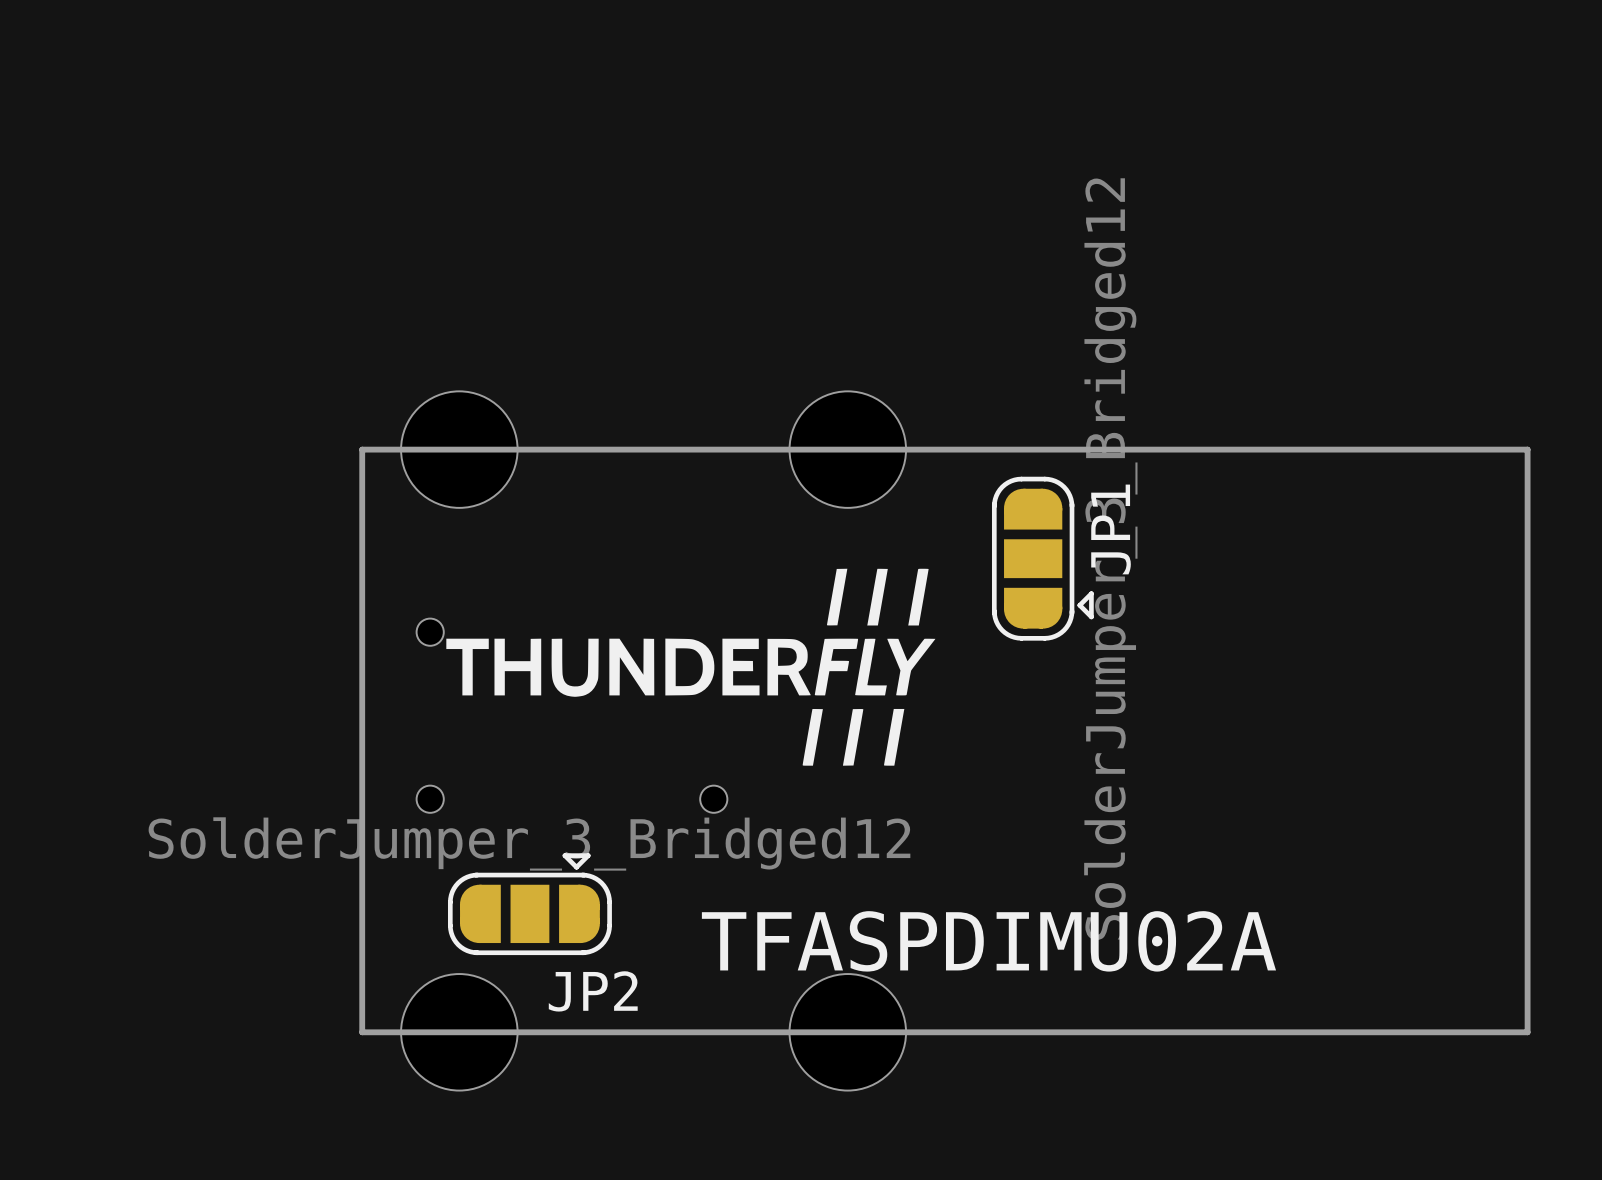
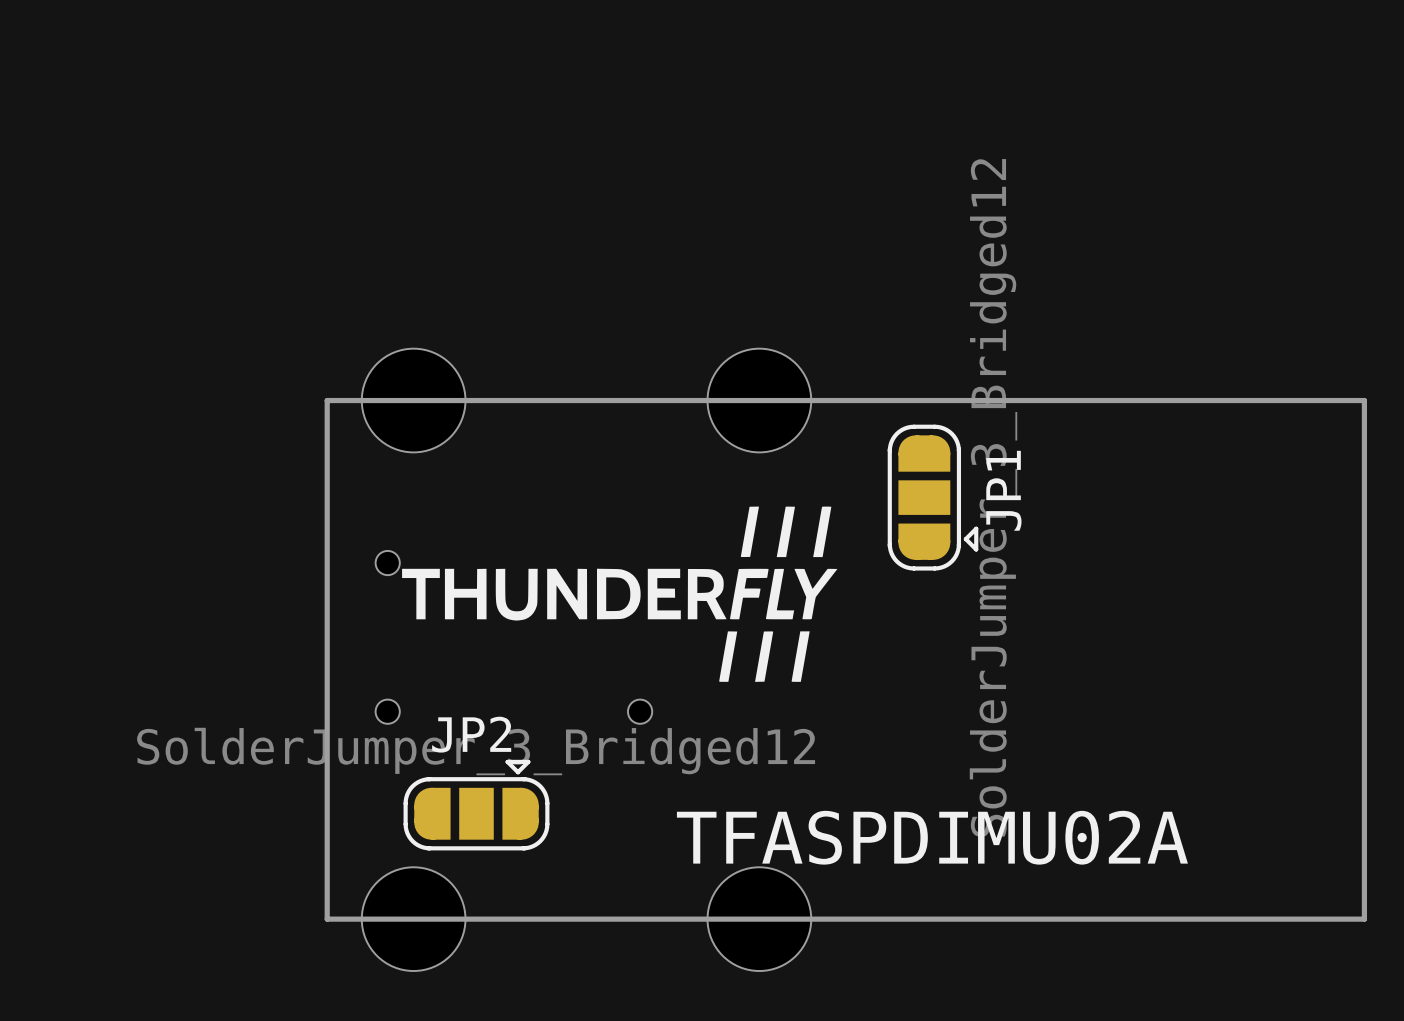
JP1 name position: JP1 (1111, 529) -> JP1 (1003, 490)
text position: TFASPDIMU02A (988, 941) -> TFASPDIMU02A (932, 837)
JP2 name position: JP2 (593, 991) -> JP2 (471, 734)

